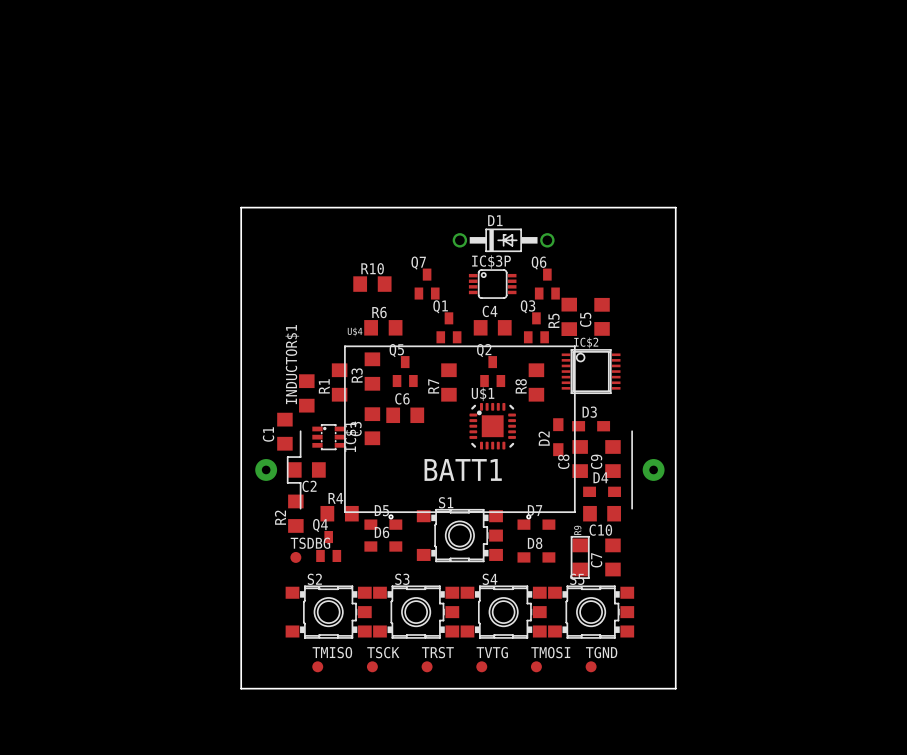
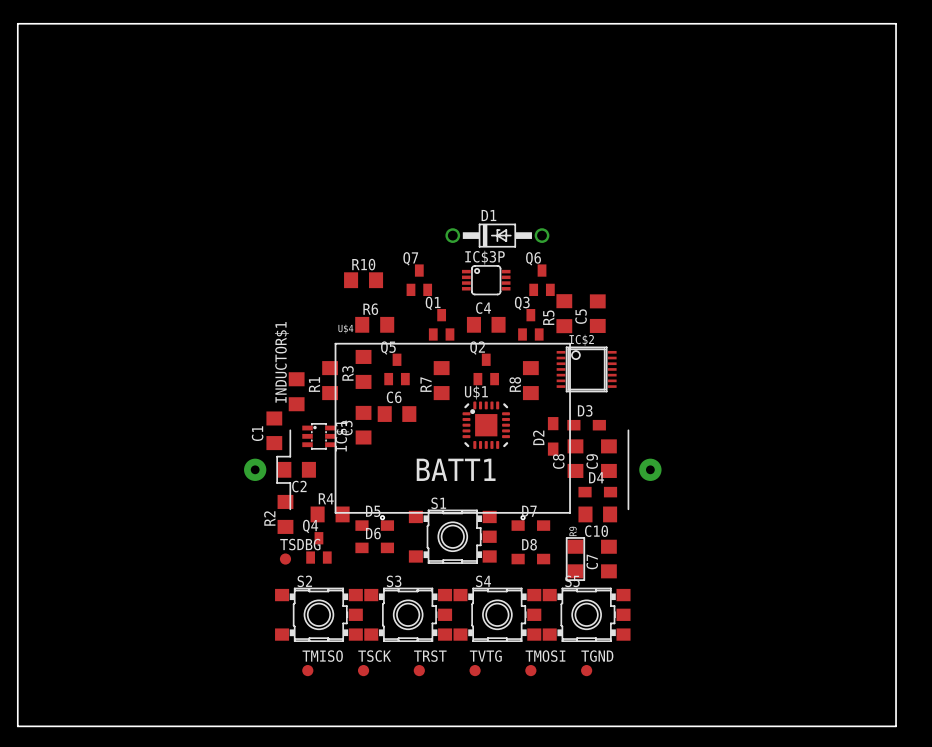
board edge: none -> (17, 23) (896, 23) (896, 726) (17, 726) (17, 23)
board edge: (241, 207) (675, 207) (675, 688) (241, 688) (241, 207) -> none

